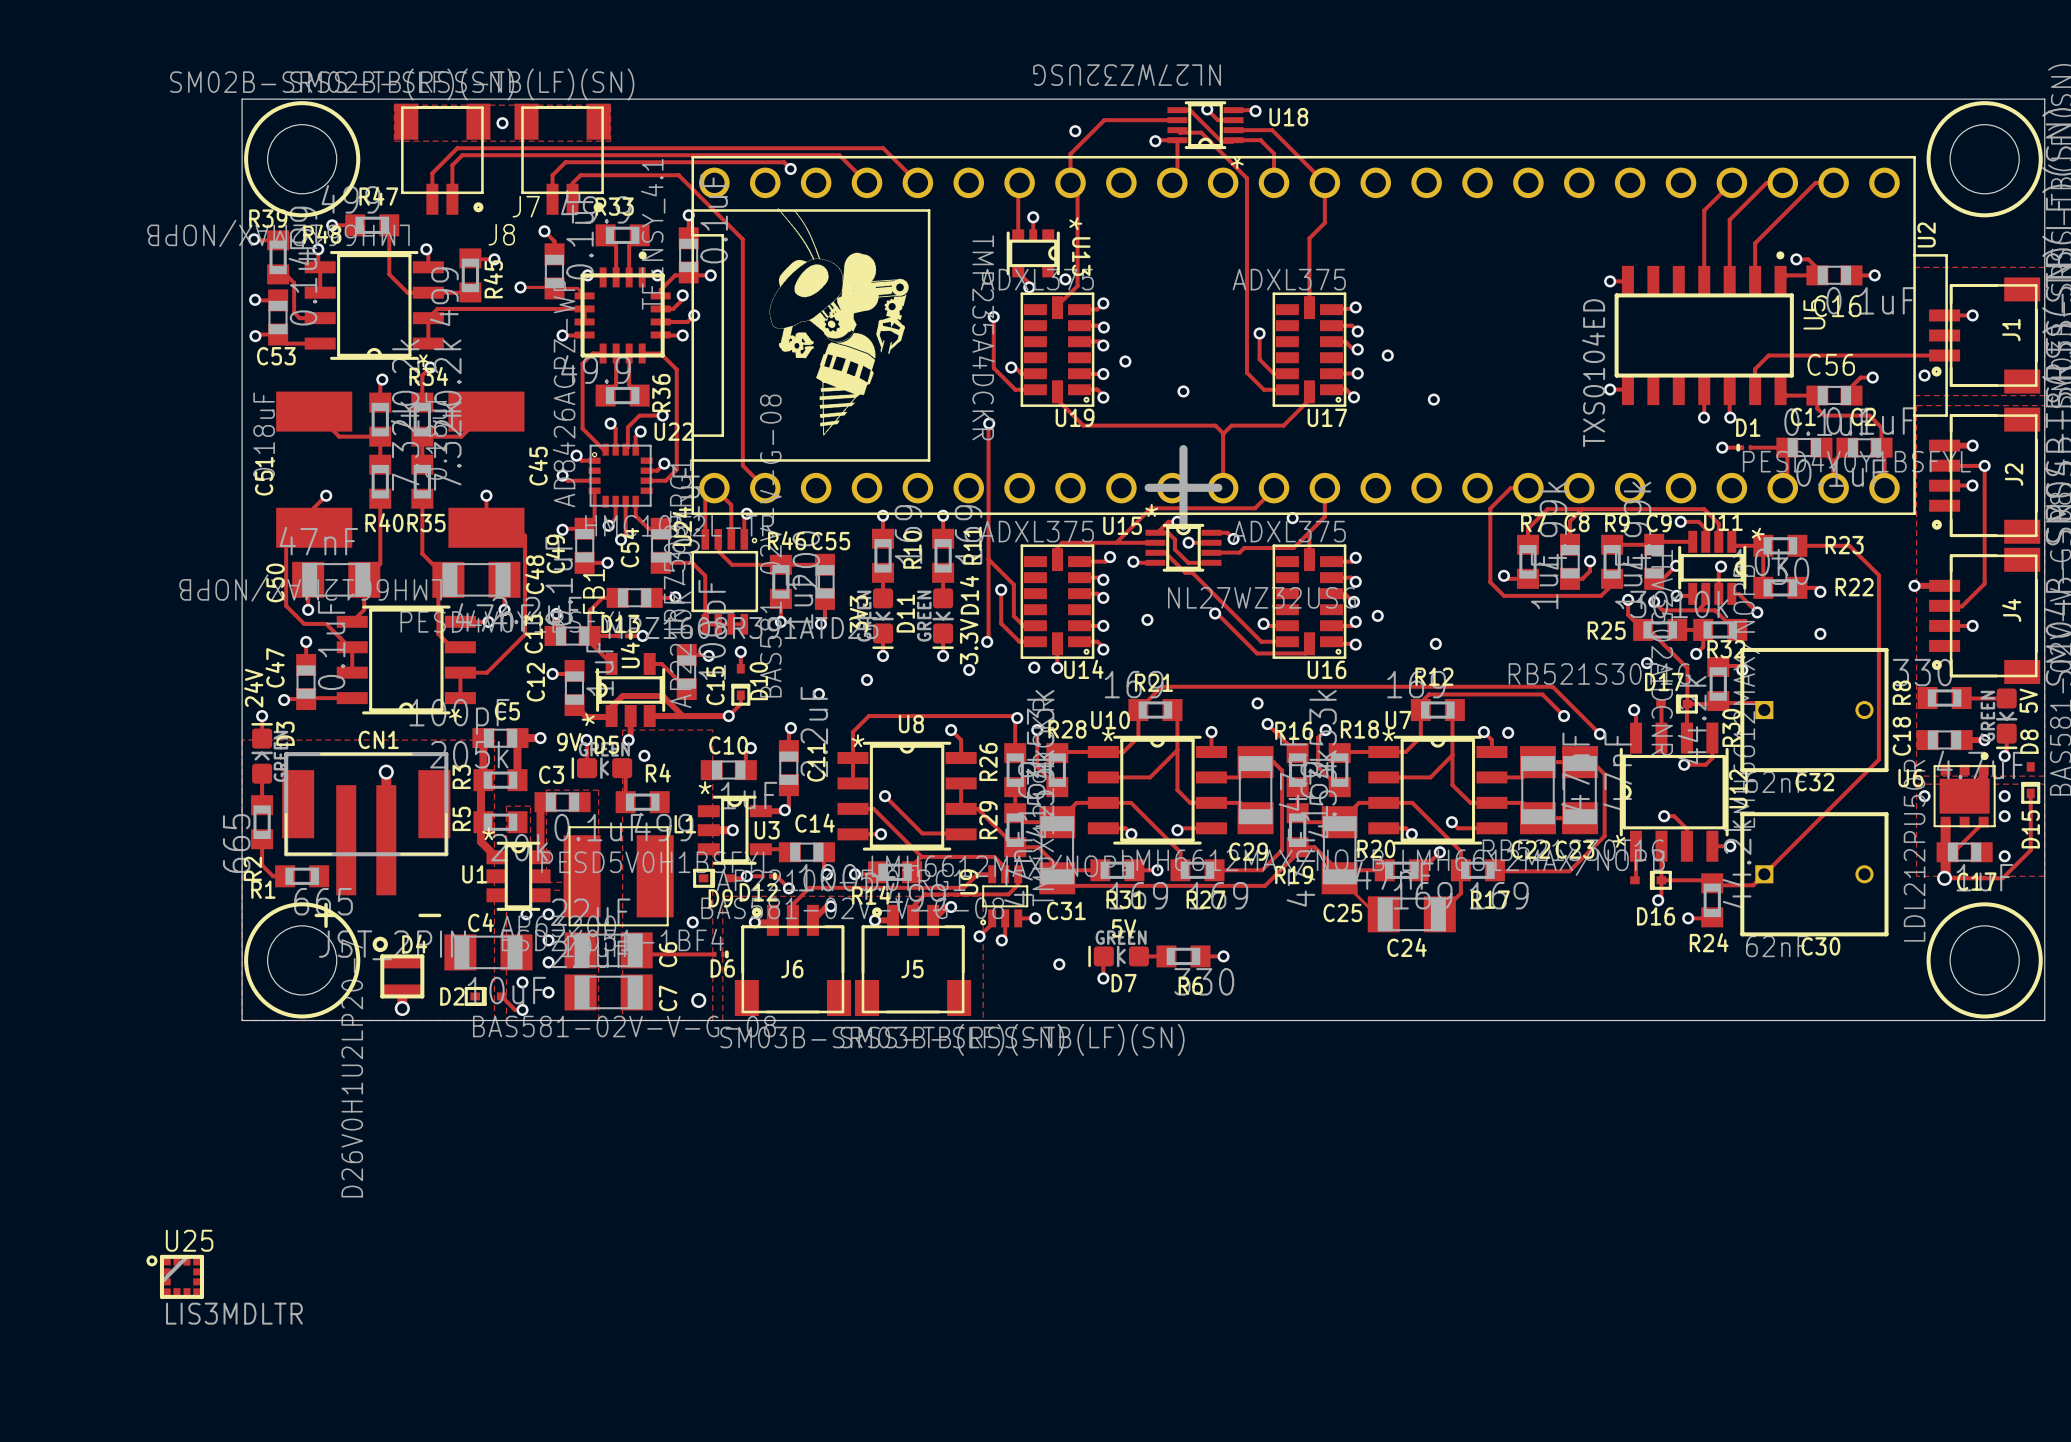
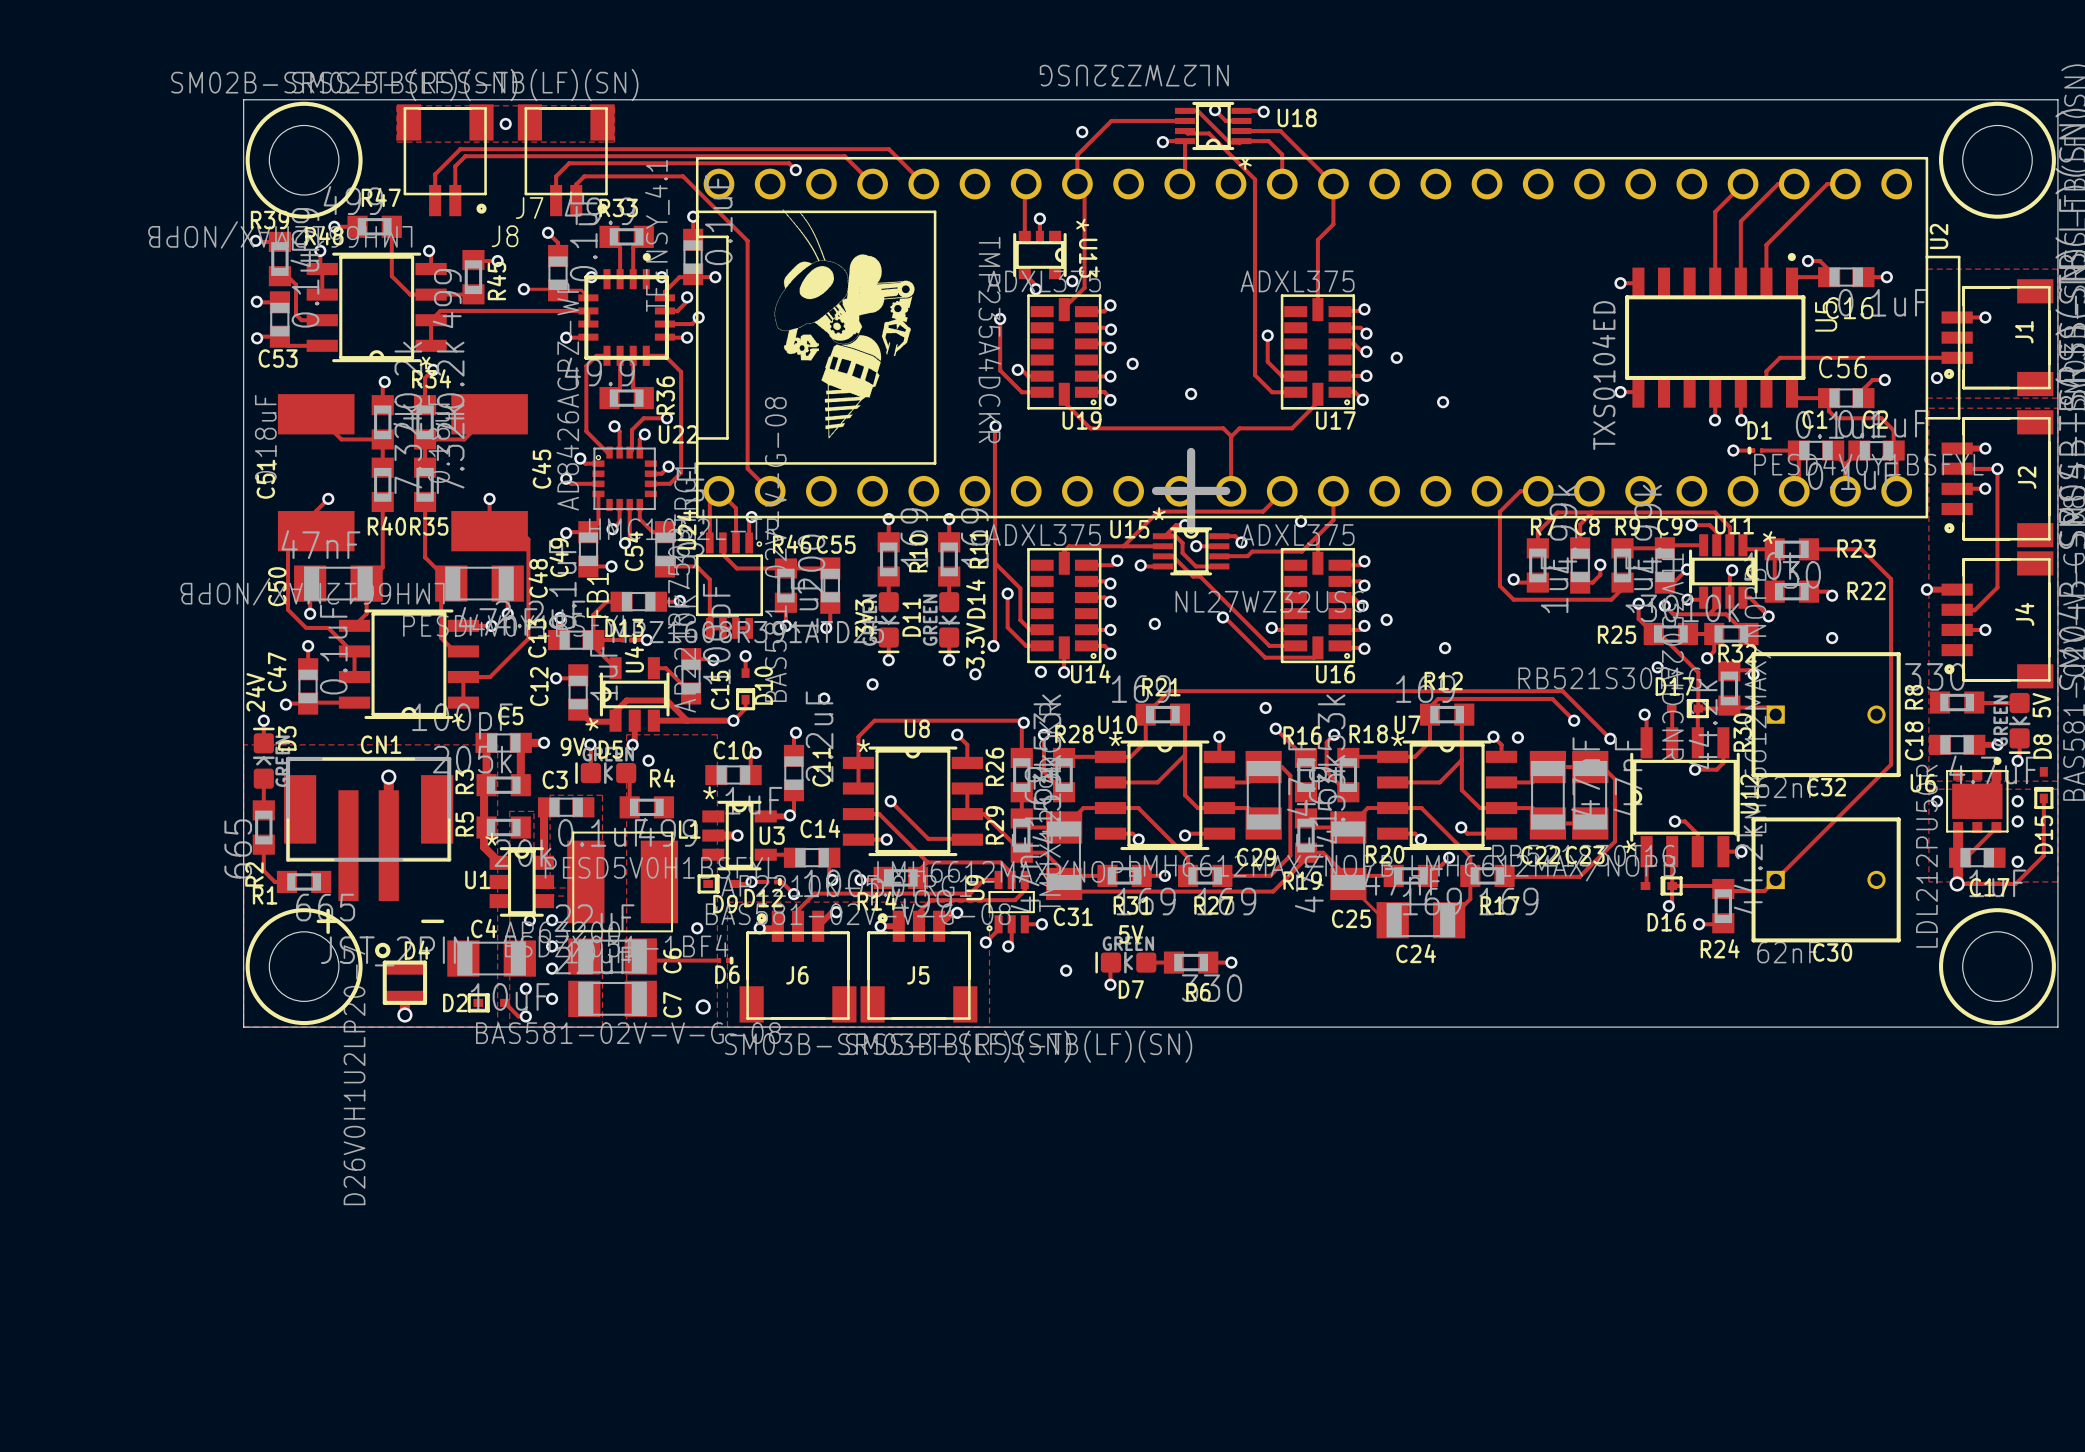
U25: LIS3MDLTR (175, 1276) -> none

